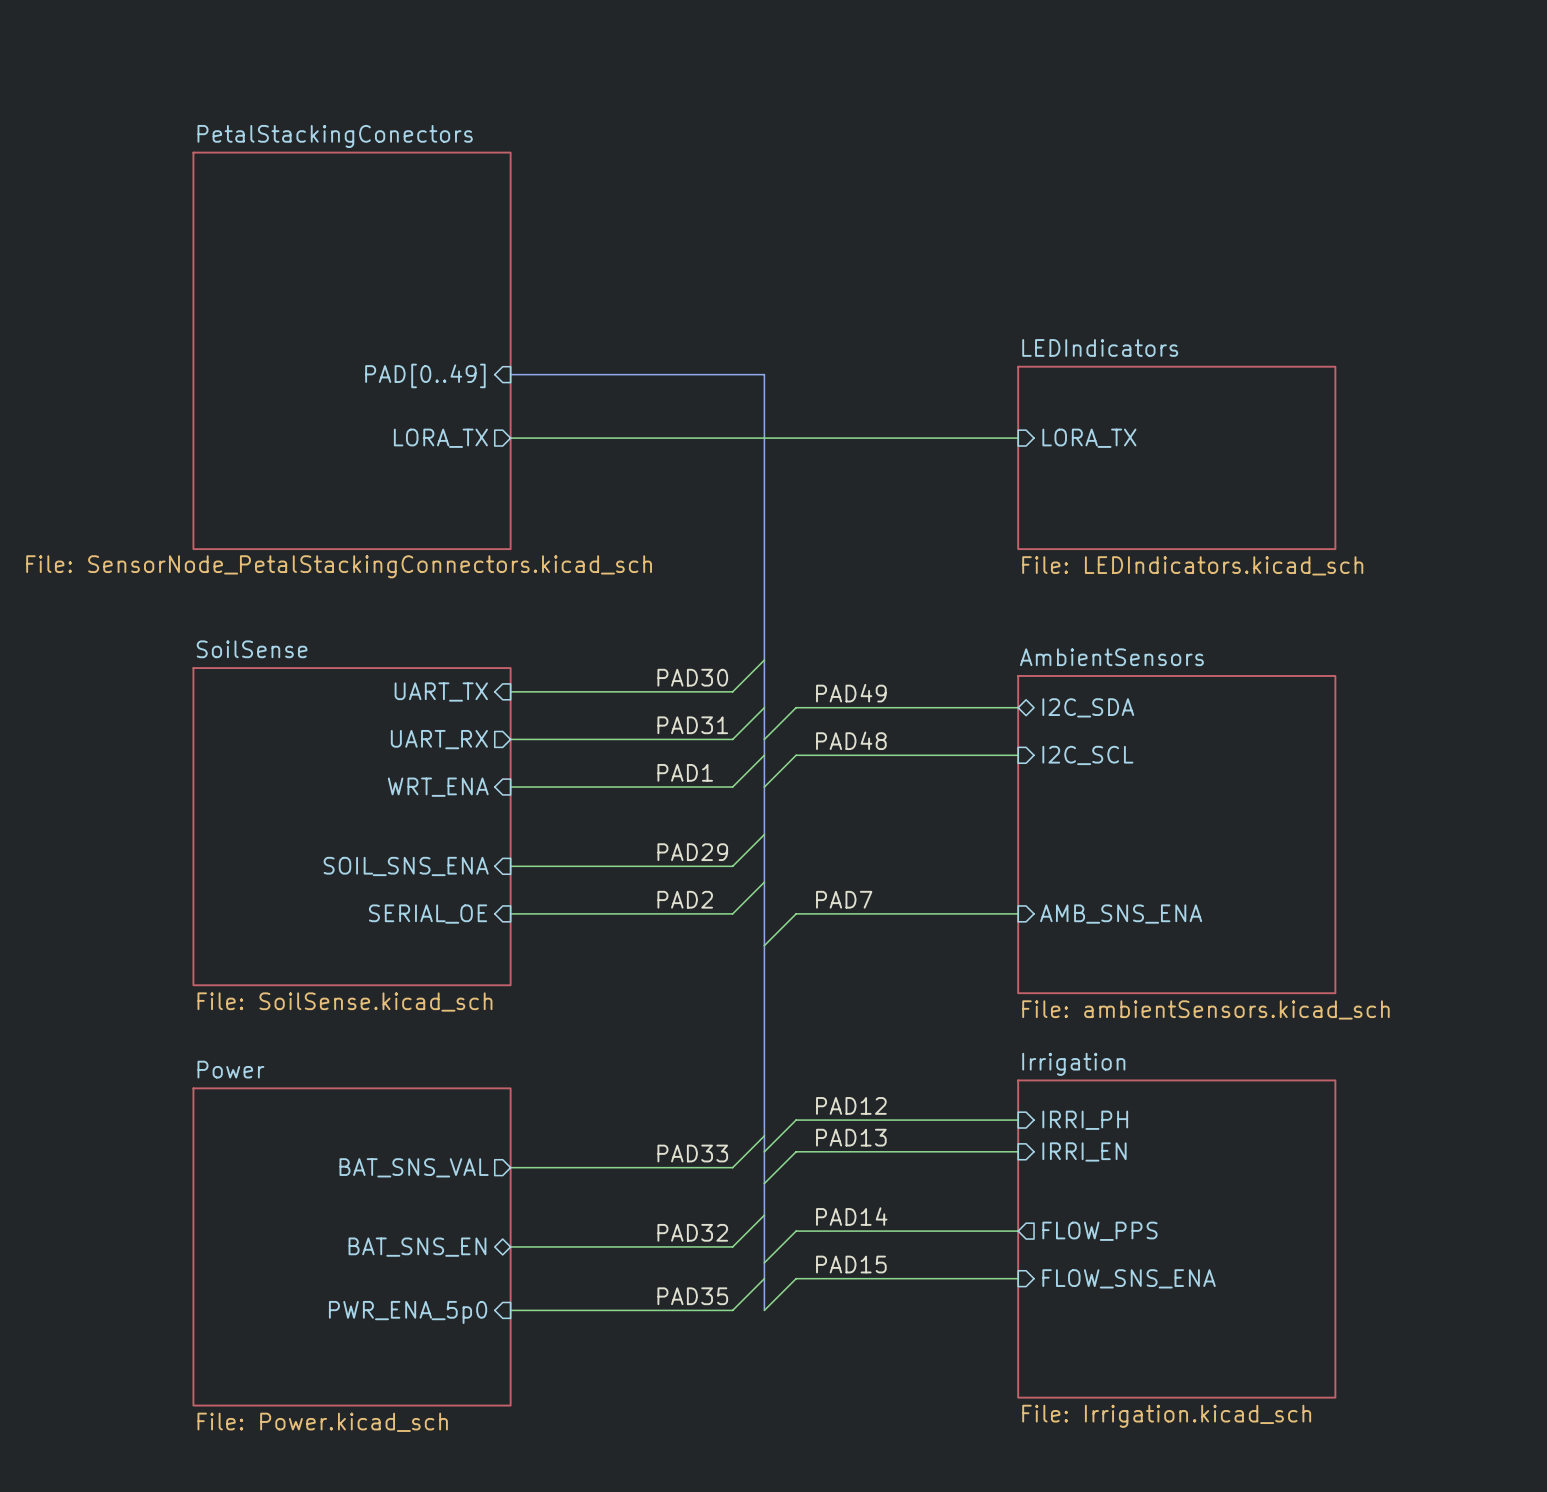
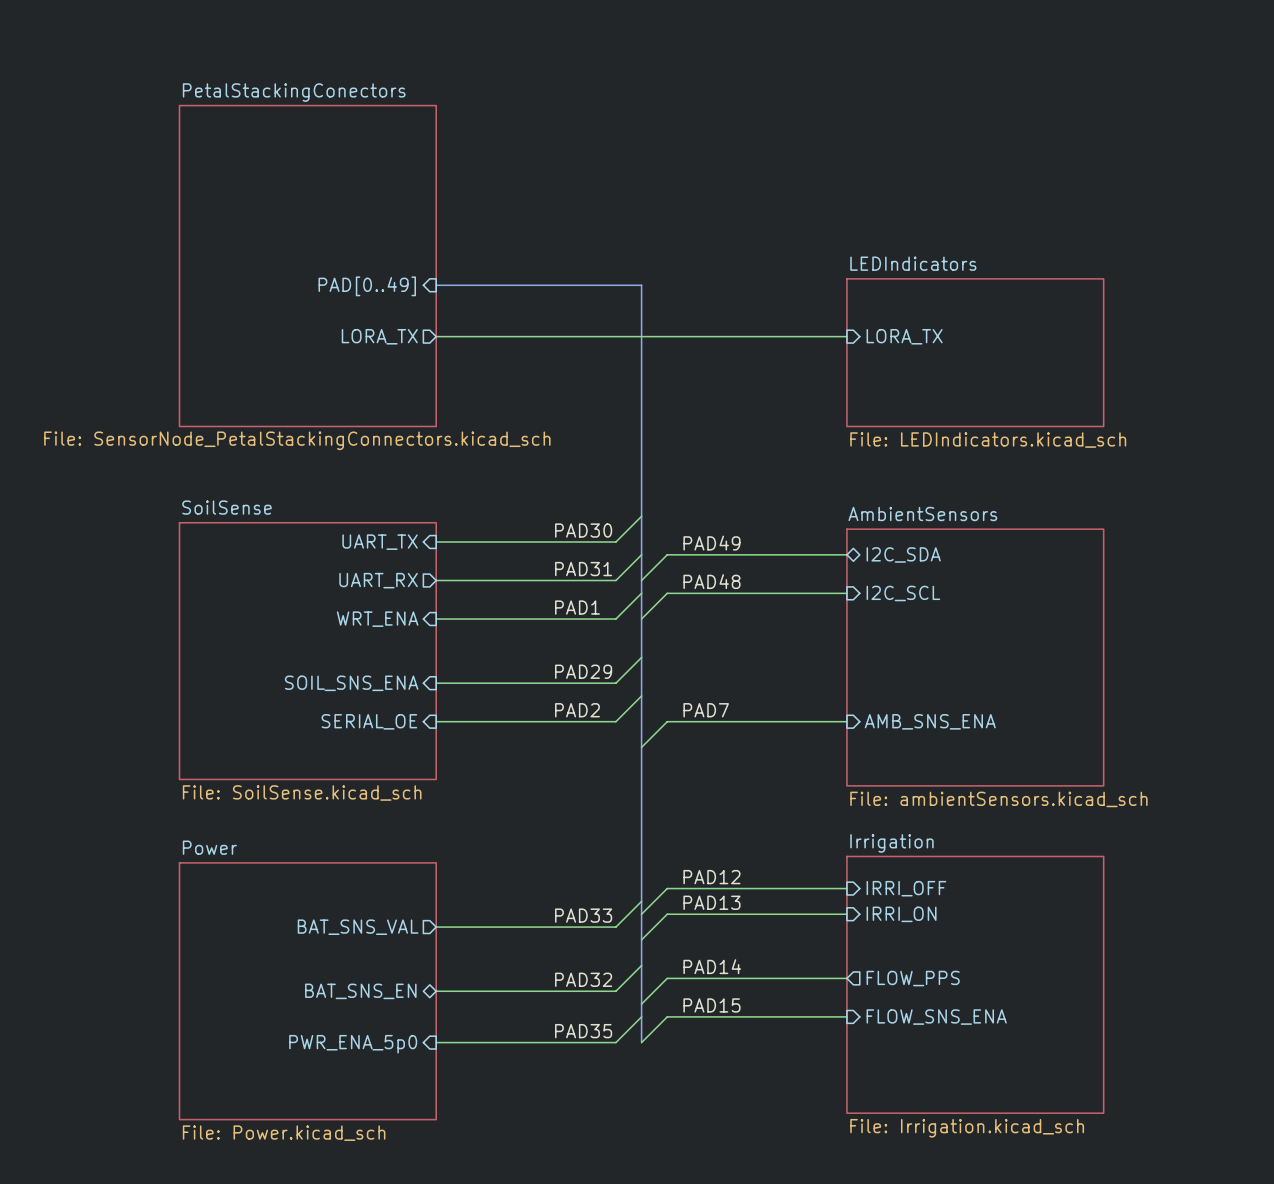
sheet pin: IRRI_PH (1085, 1120) -> IRRI_OFF (906, 888)
sheet pin: IRRI_EN (1084, 1151) -> IRRI_ON (901, 914)

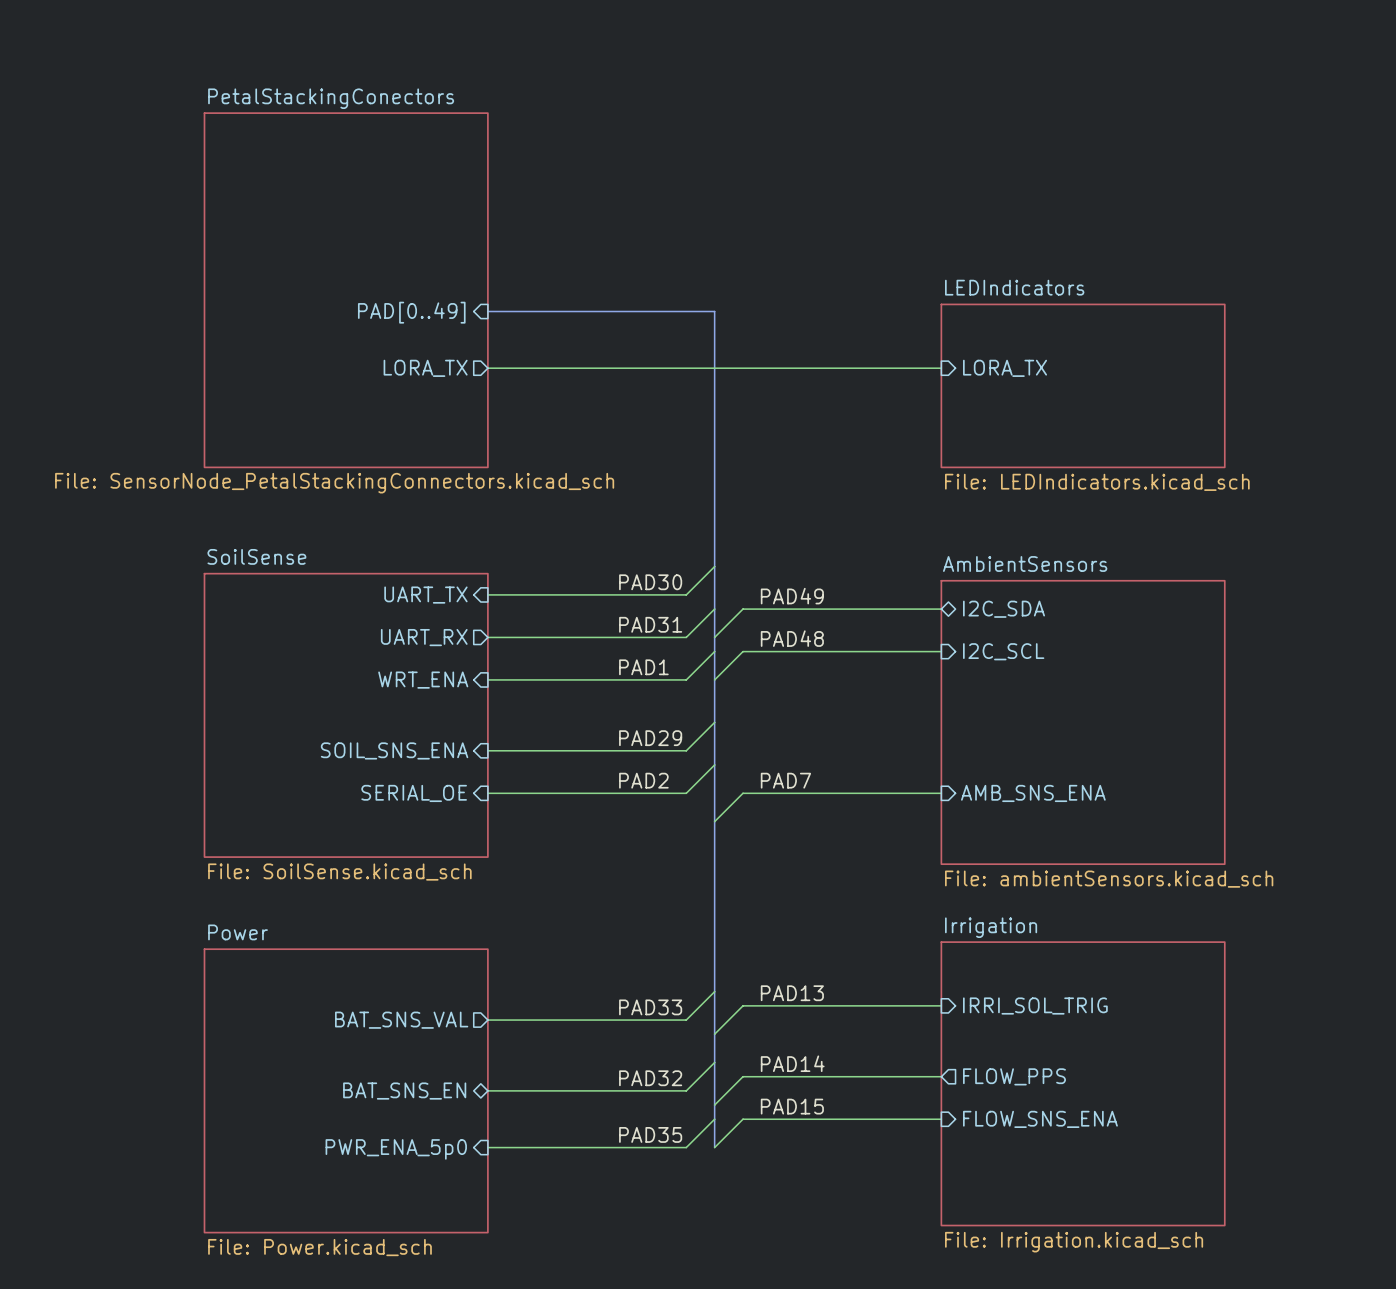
label: PAD12 (711, 877) -> none
wire: (846, 888) (667, 888) (641, 914) -> none
sheet pin: IRRI_OFF (906, 888) -> none
sheet pin: IRRI_ON (901, 914) -> IRRI_SOL_TRIG (1035, 1006)

